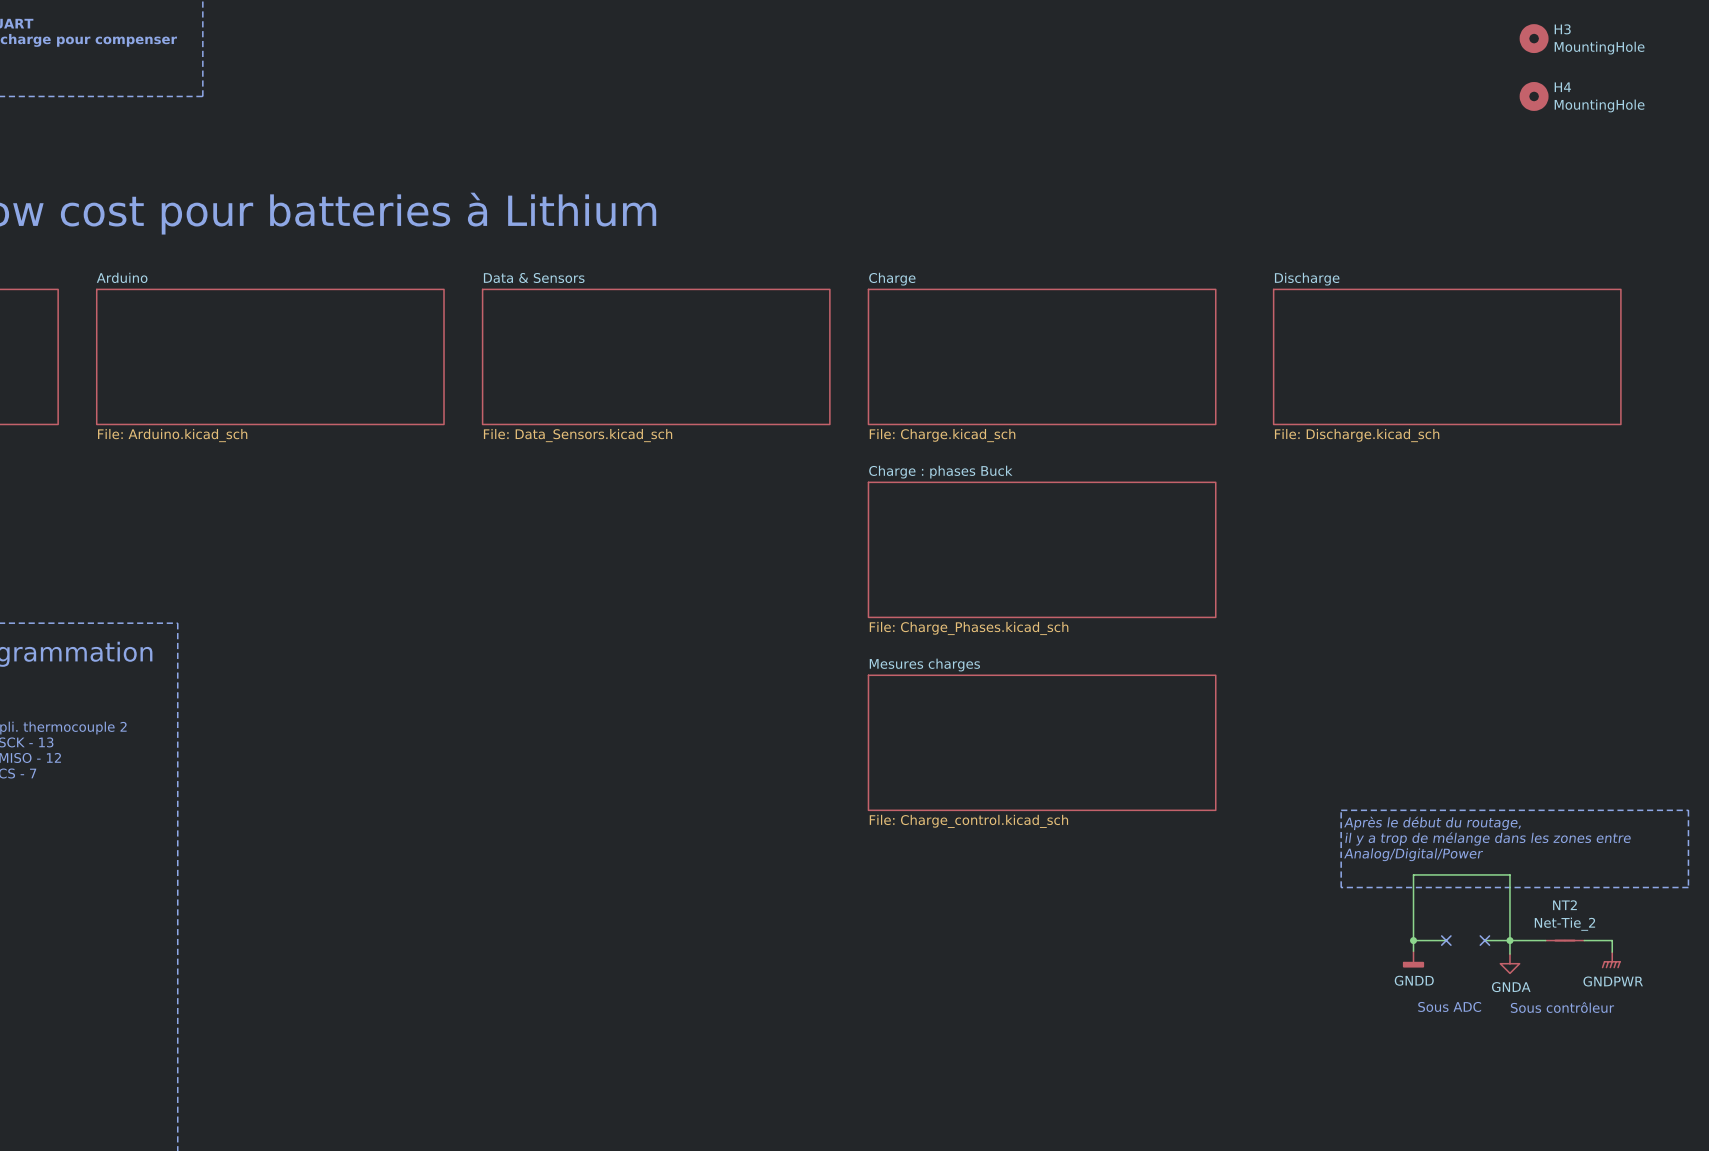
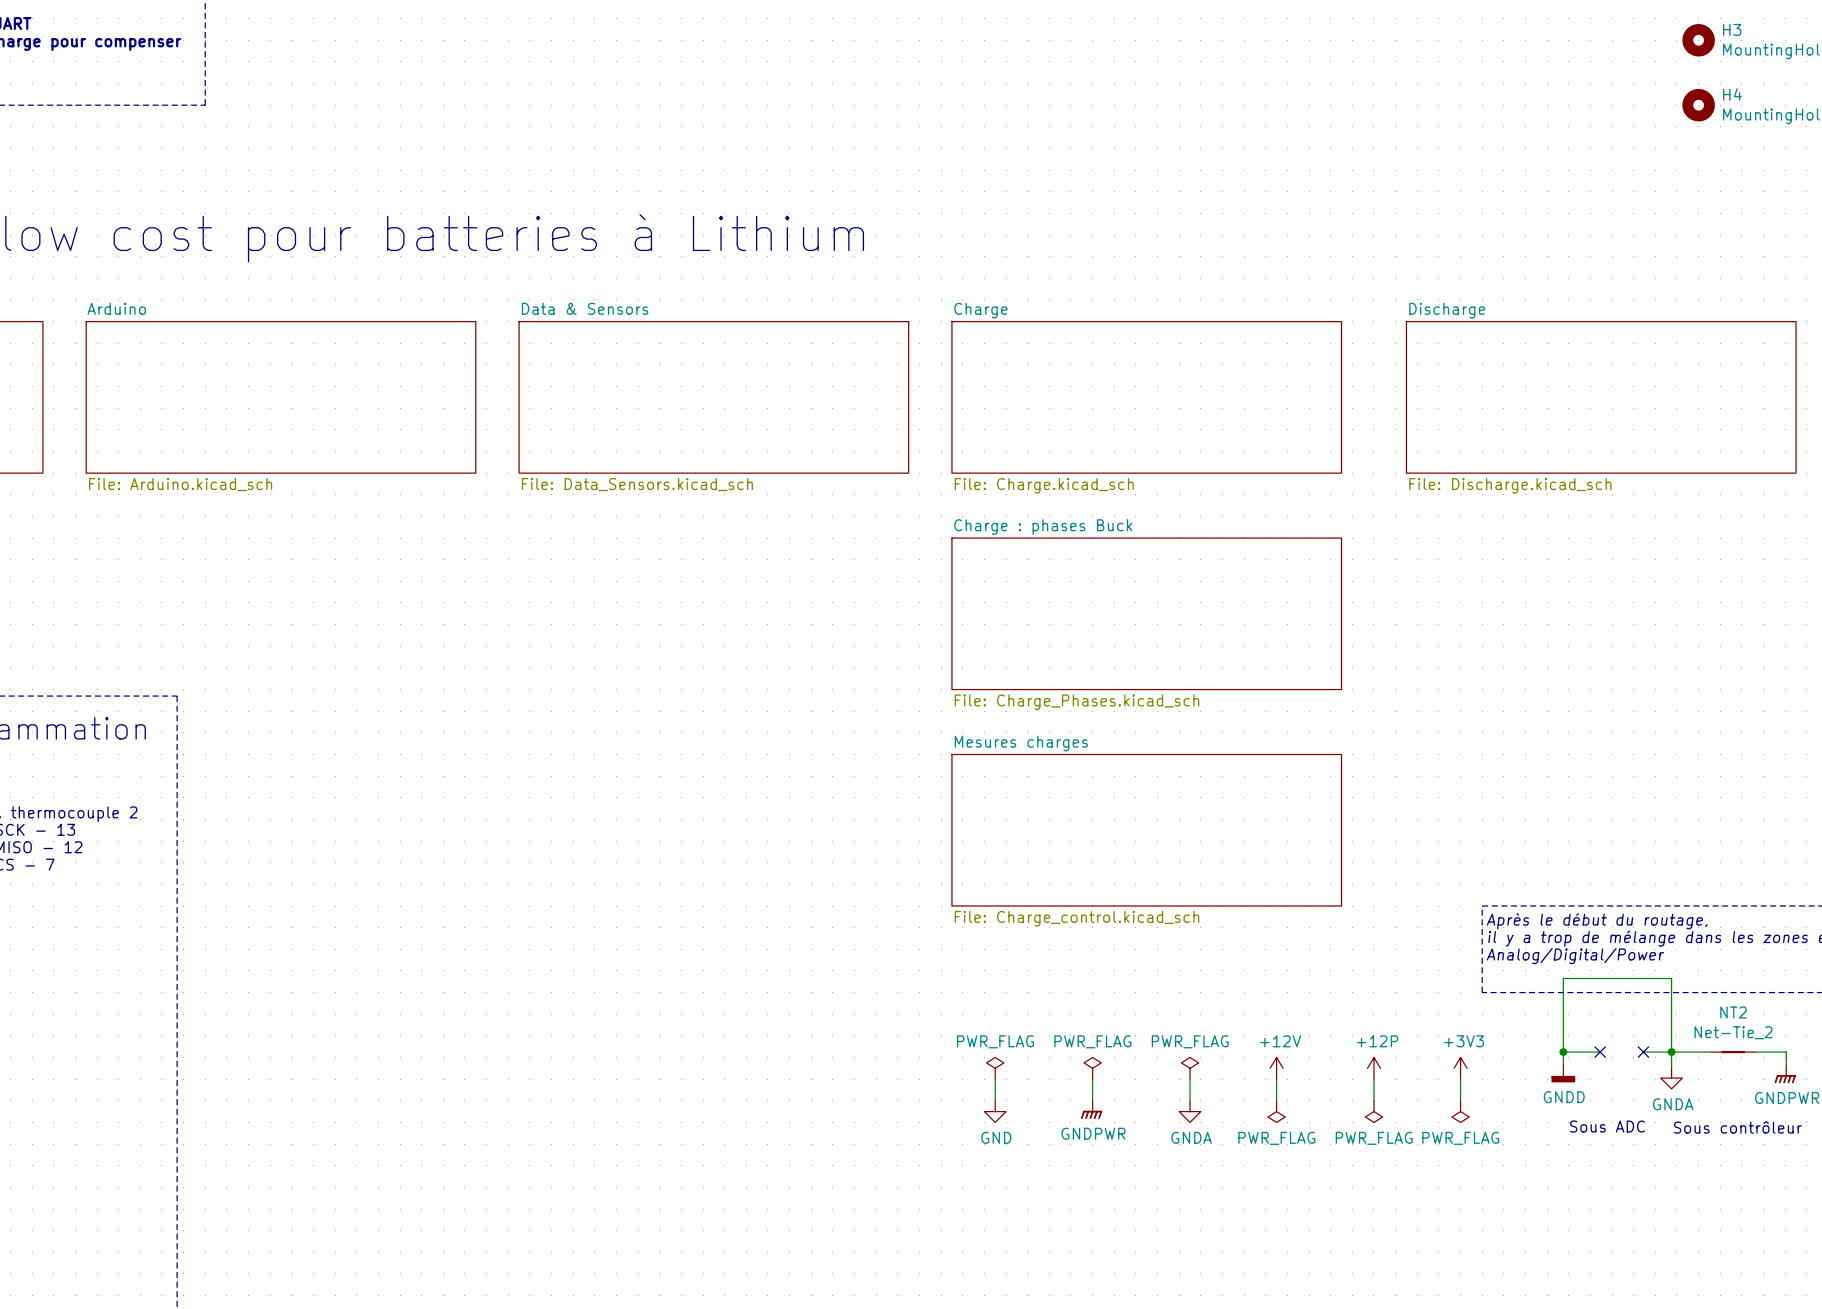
power symbol: none -> PWR_FLAG (995, 1068)
power symbol: none -> PWR_FLAG (1092, 1068)
power symbol: none -> PWR_FLAG (1190, 1068)
power symbol: none -> +12V (1276, 1068)
power symbol: none -> +12P (1373, 1068)
power symbol: none -> +3V3 (1460, 1068)
wire: none -> (995, 1079) (995, 1100)
wire: none -> (1092, 1079) (1092, 1100)
wire: none -> (1190, 1079) (1190, 1100)
wire: none -> (1276, 1079) (1276, 1100)
wire: none -> (1373, 1079) (1373, 1100)
wire: none -> (1460, 1079) (1460, 1100)
power symbol: none -> GNDPWR (1091, 1109)
power symbol: none -> GND (995, 1111)
power symbol: none -> GNDA (1190, 1111)
power symbol: none -> PWR_FLAG (1276, 1111)
power symbol: none -> PWR_FLAG (1373, 1111)
power symbol: none -> PWR_FLAG (1460, 1111)

